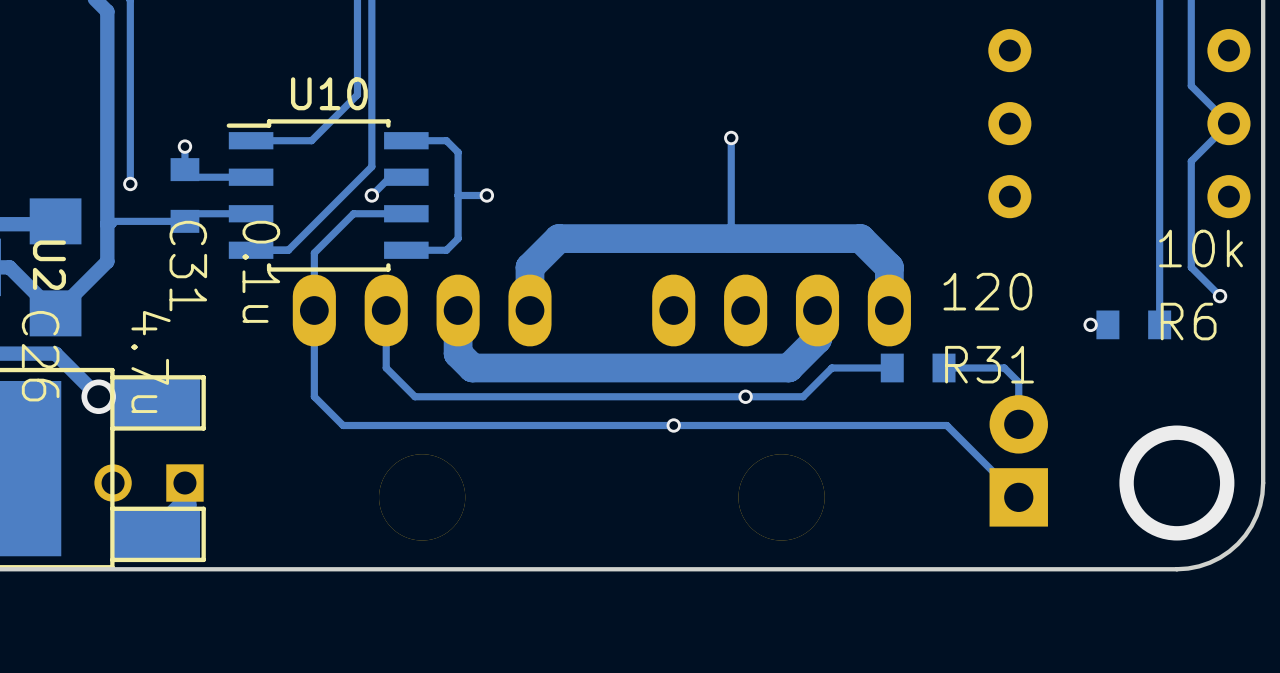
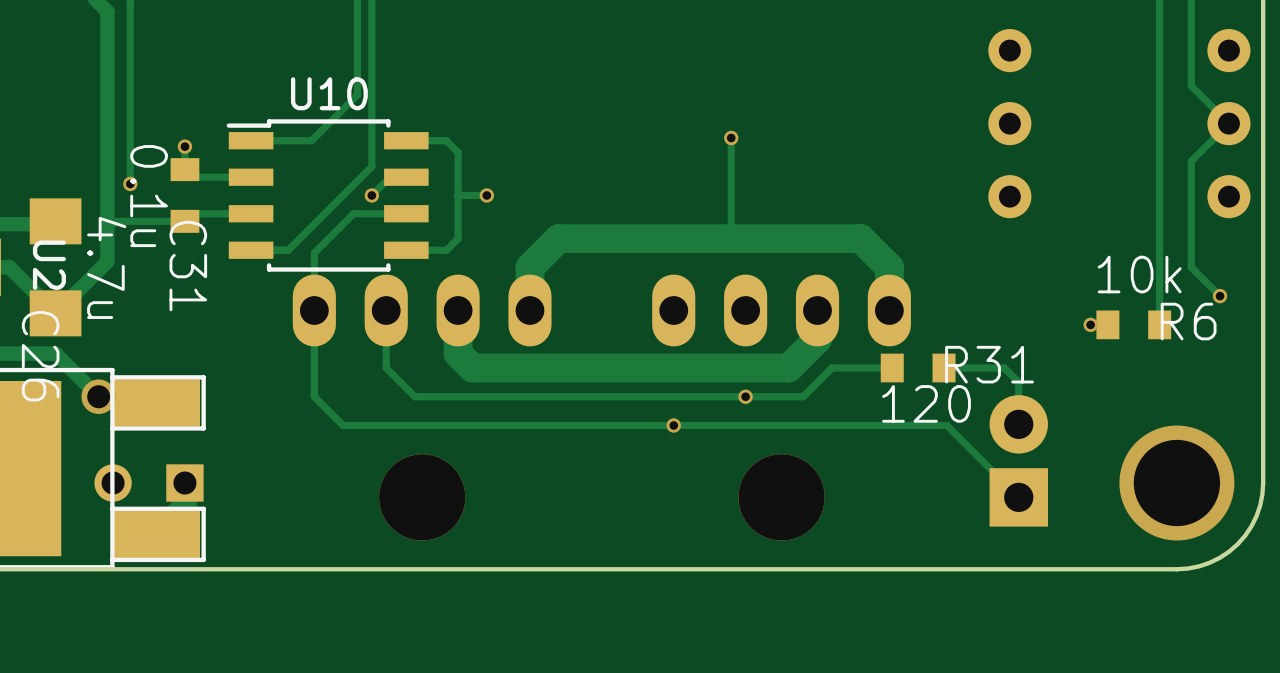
R6 value position: 10k (1201, 248) -> 10k (1139, 274)
C31 value position: 0.1u (261, 271) -> 0.1u (149, 196)
R31 value position: 120 (987, 291) -> 120 (926, 403)
C26 value position: 4.7u (151, 361) -> 4.7u (106, 267)

